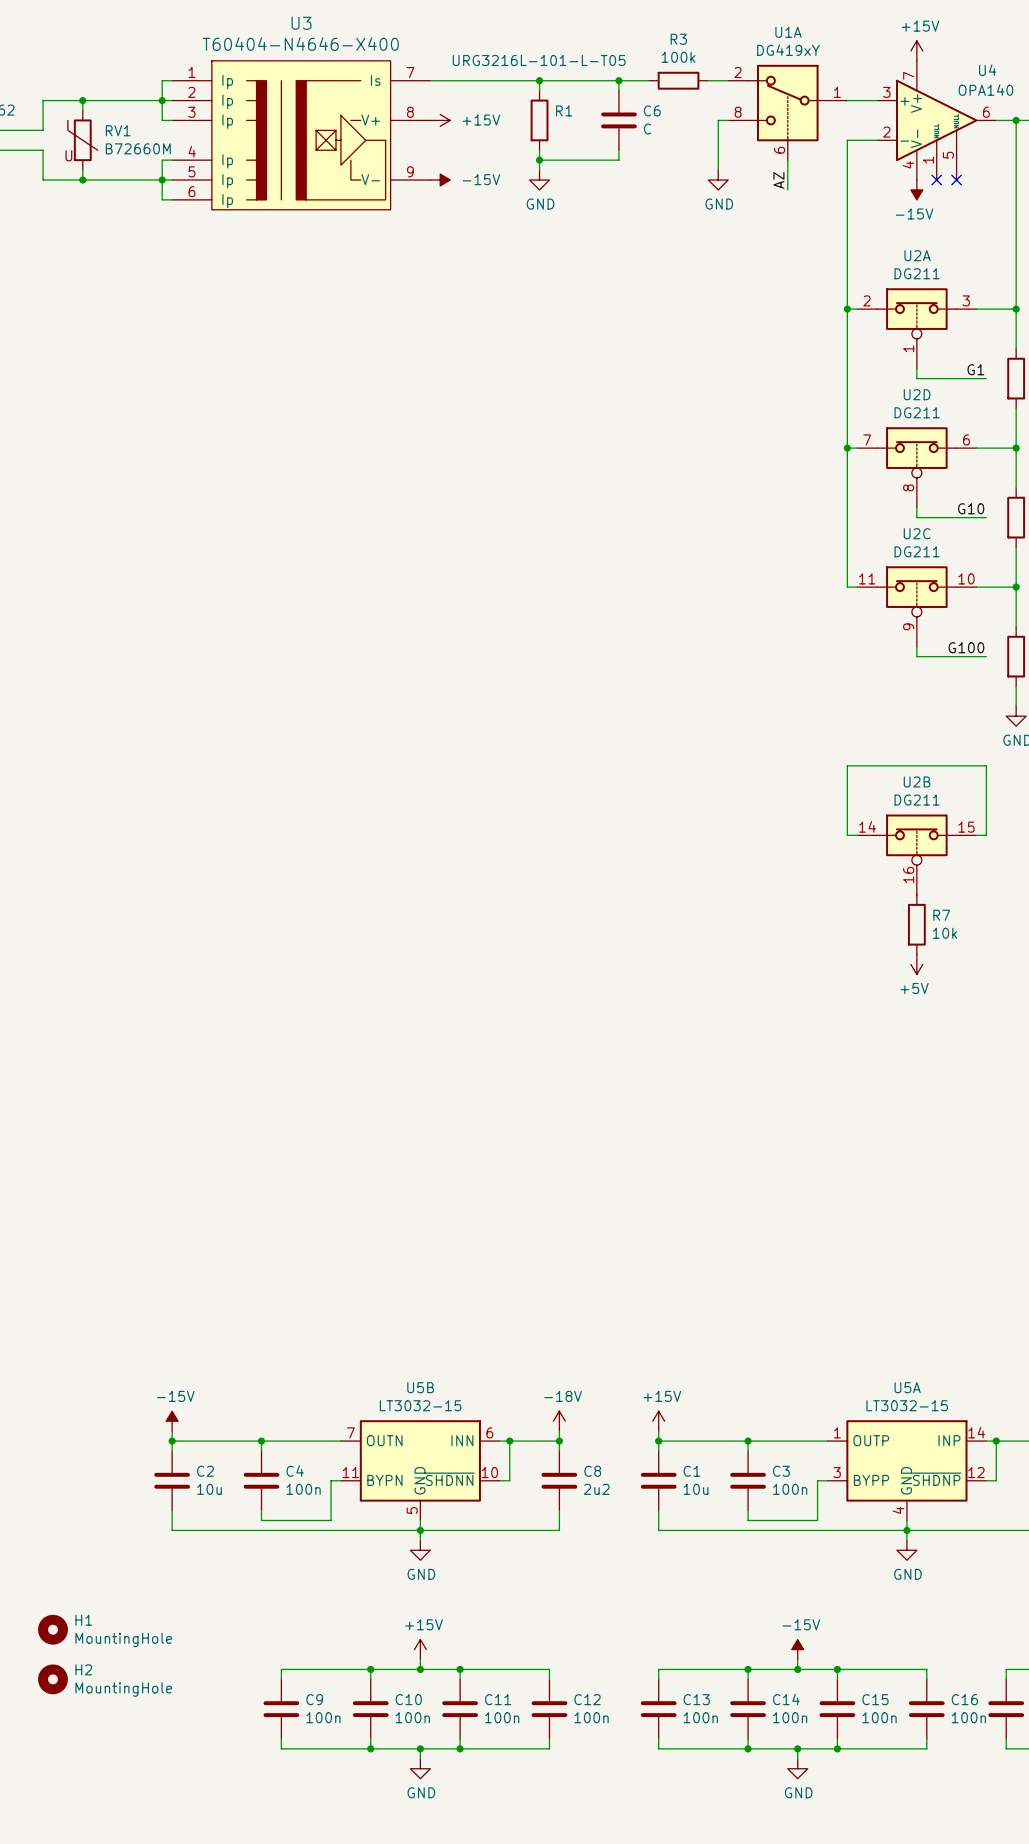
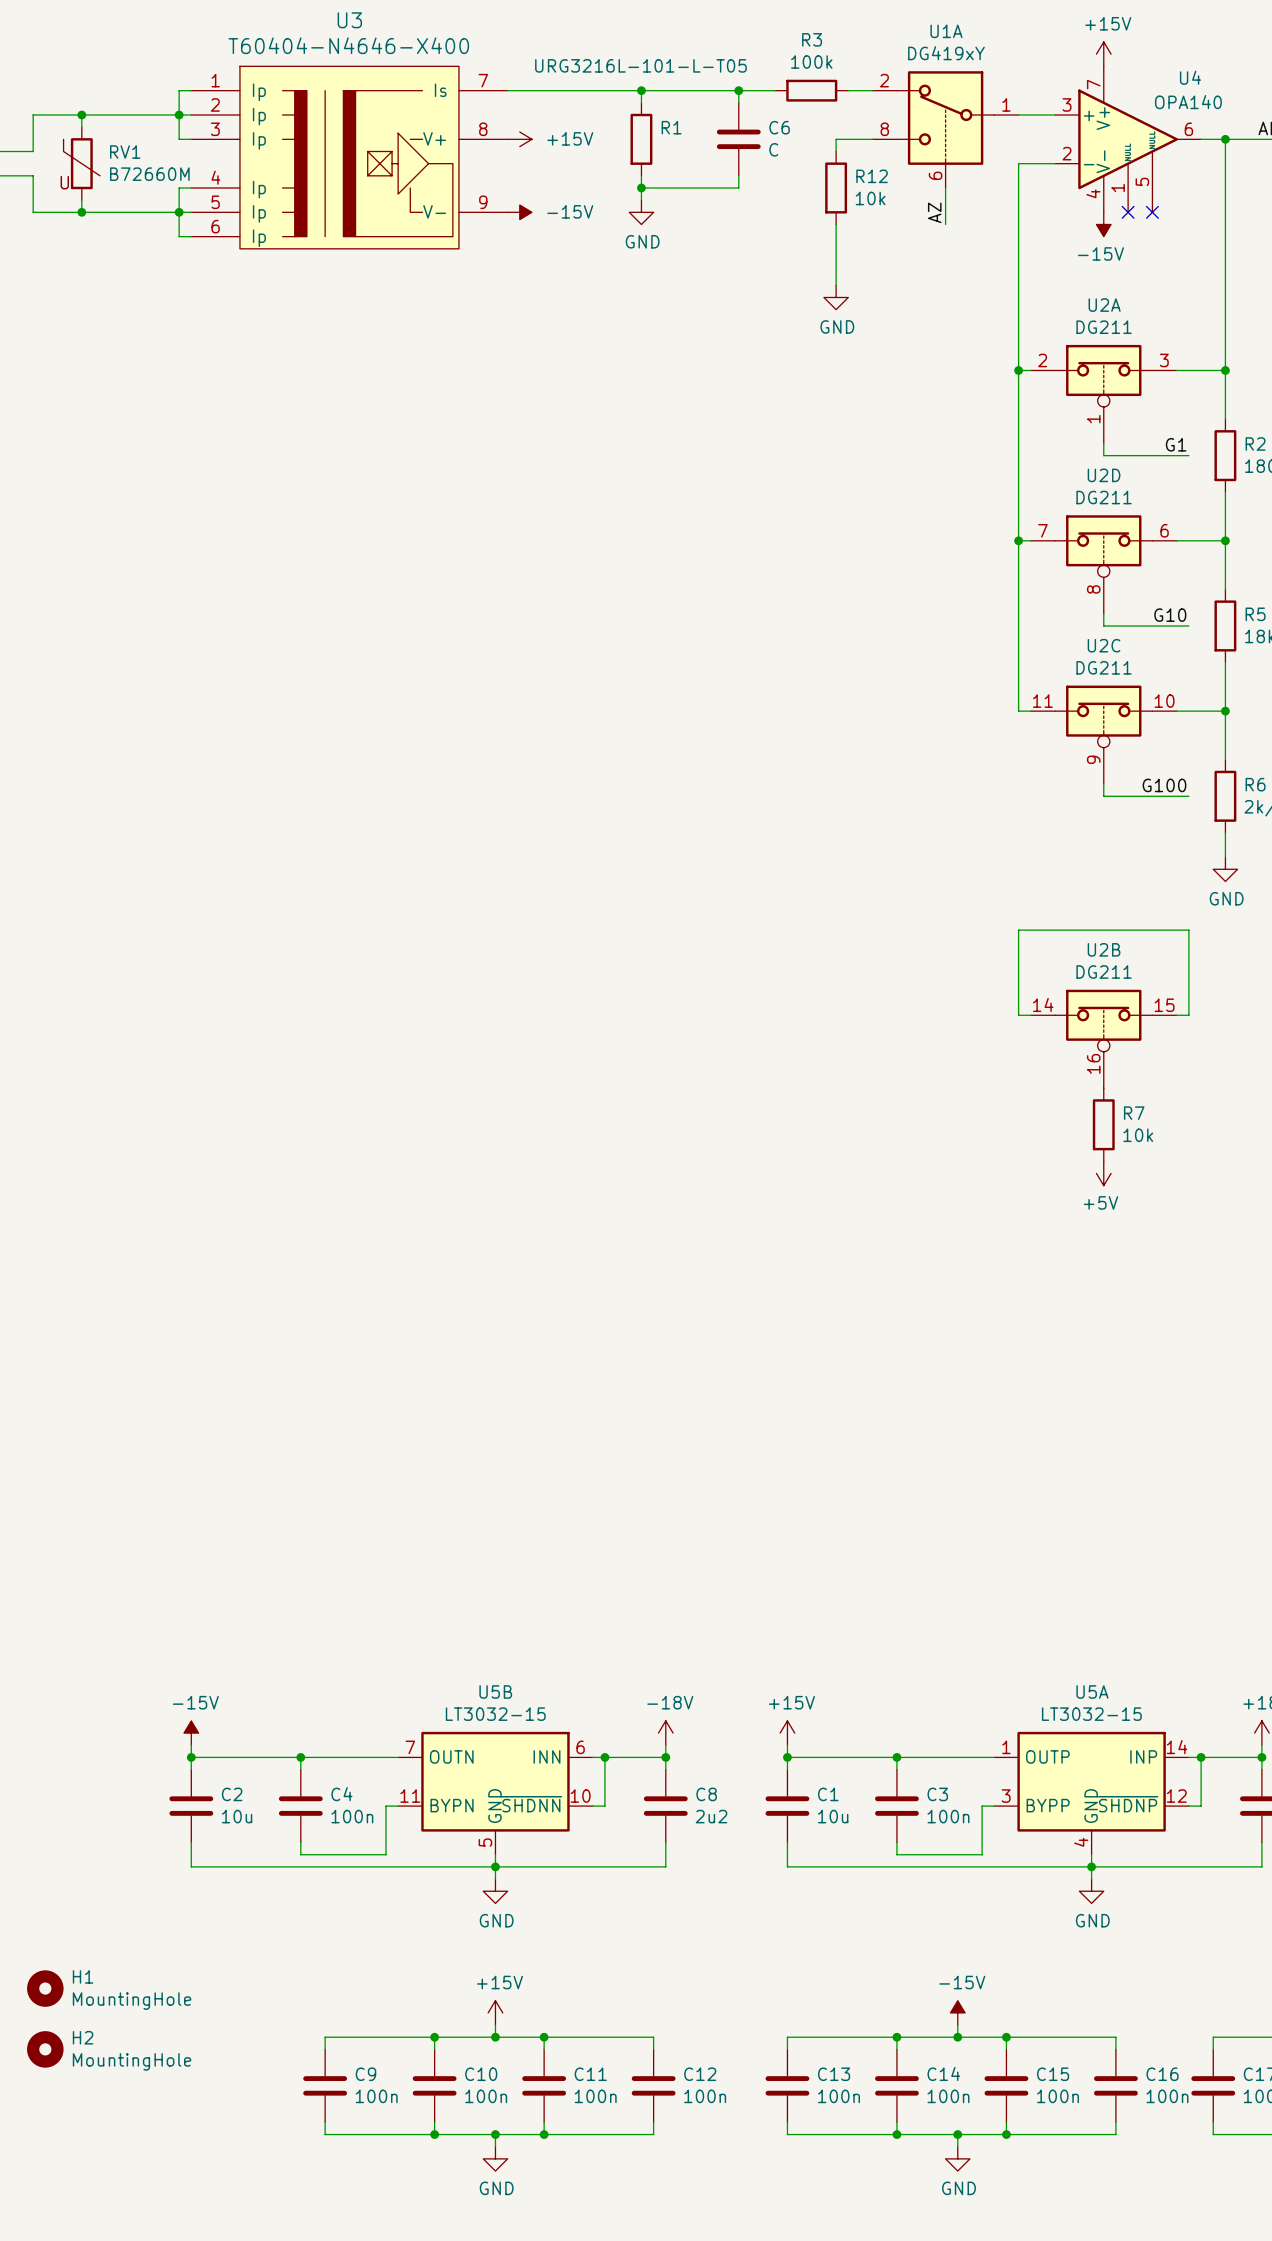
wire: (718, 120) (718, 170) -> (860, 139) (836, 139) (836, 151)
R12: none -> 10k (836, 188)
power symbol position: GND (718, 180) -> GND (836, 297)
wire: none -> (836, 224) (836, 285)

